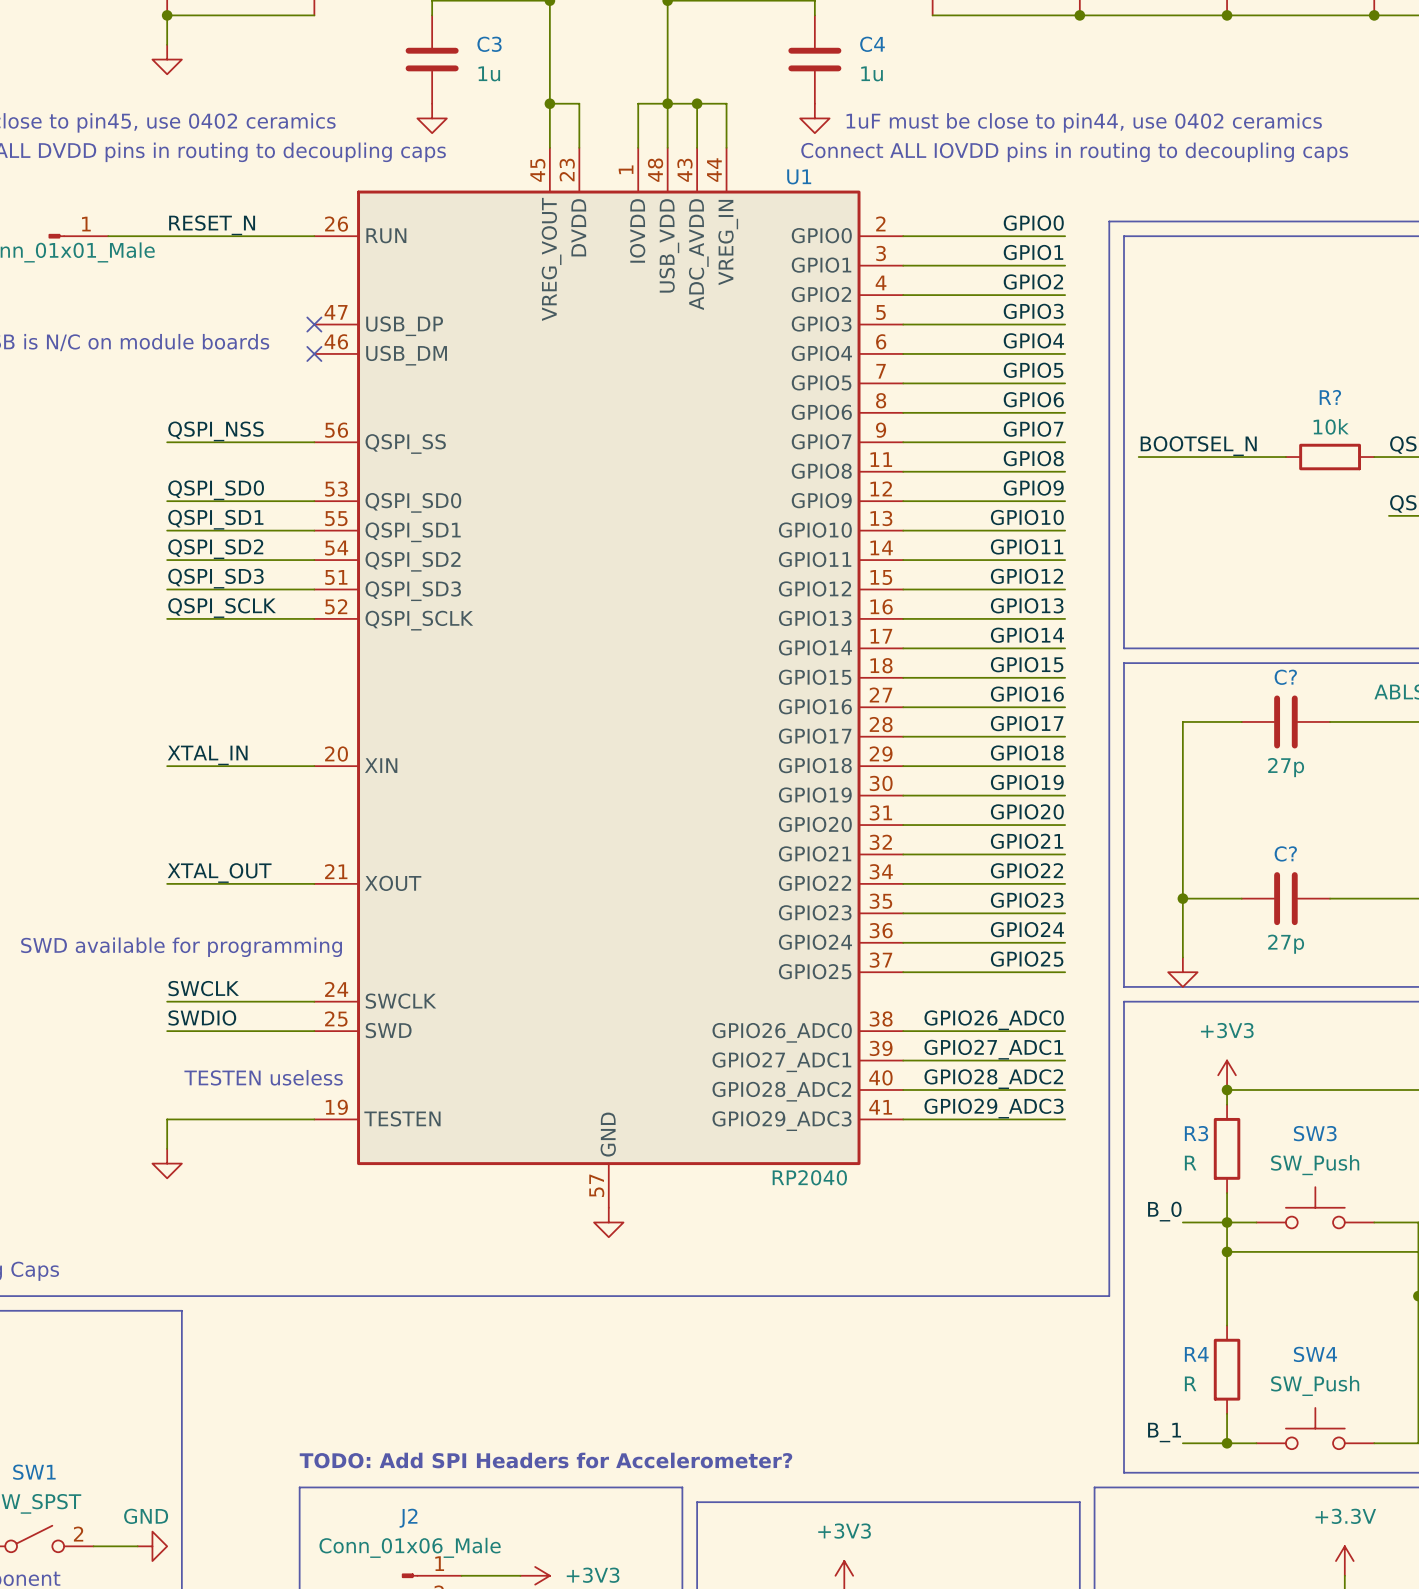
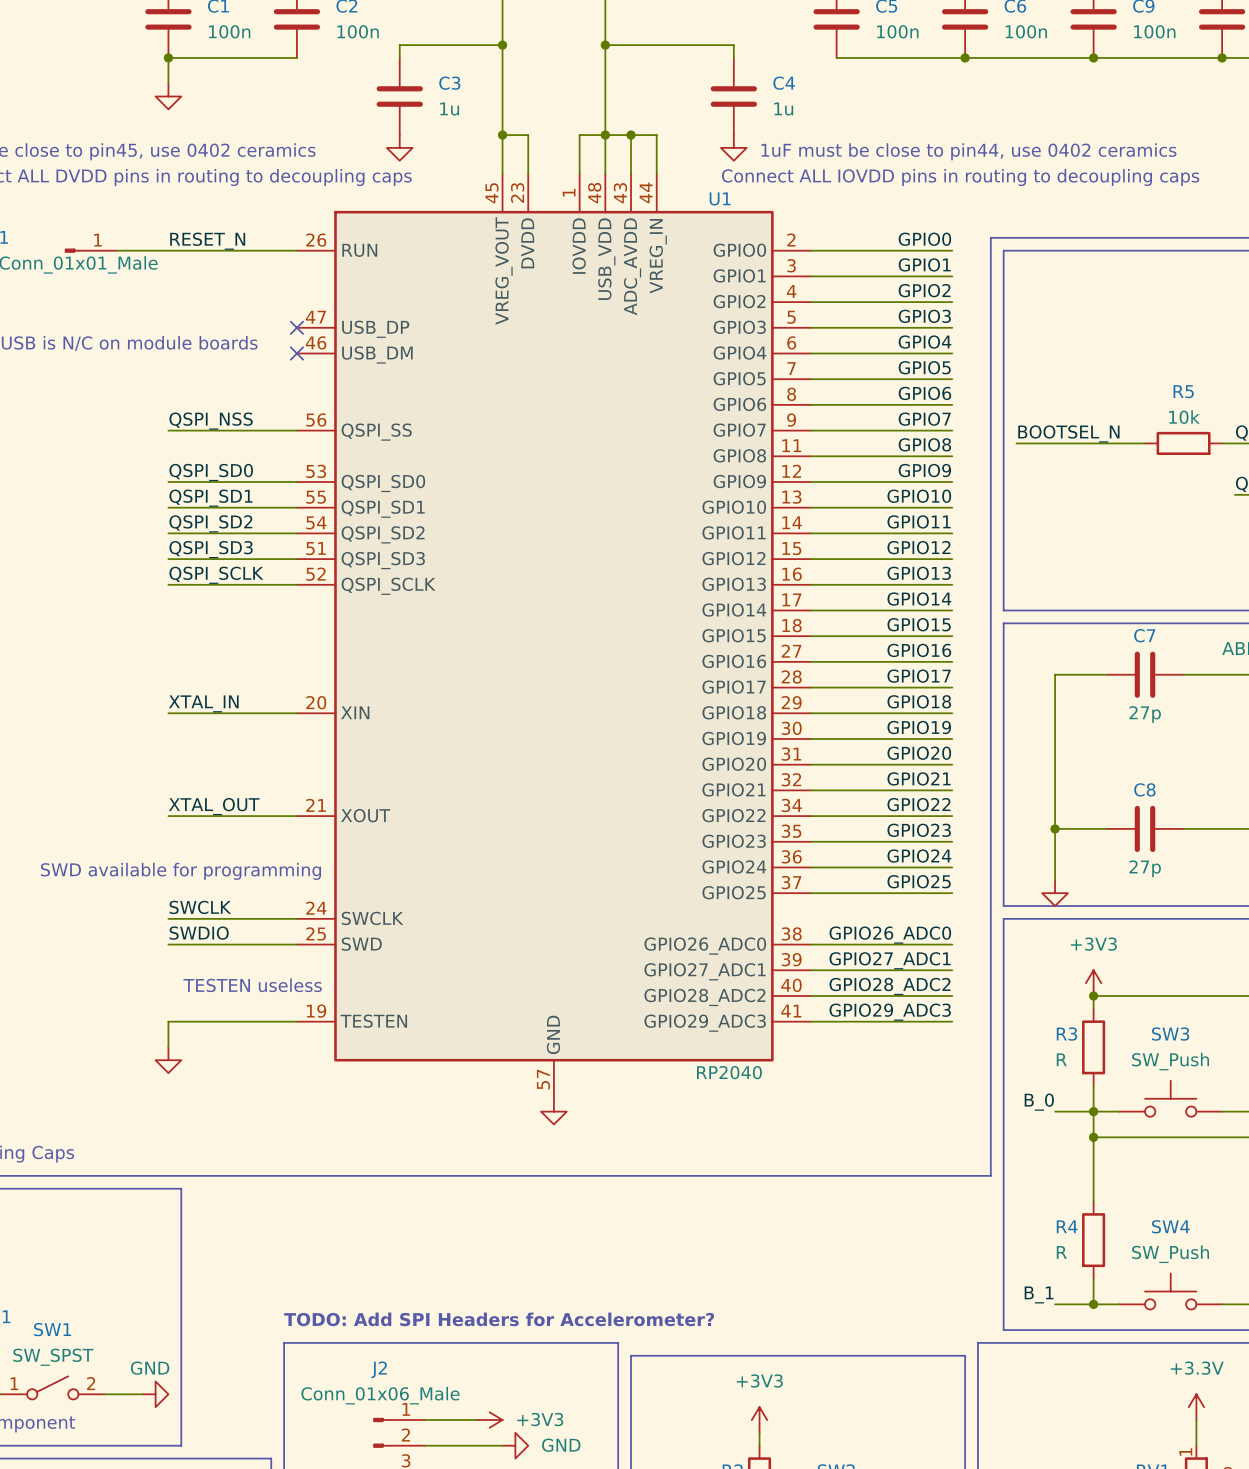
R? name: R? (1330, 397) -> R5 (1183, 391)
C? name: C? (1285, 677) -> C7 (1144, 635)
C? name: C? (1285, 853) -> C8 (1144, 789)

